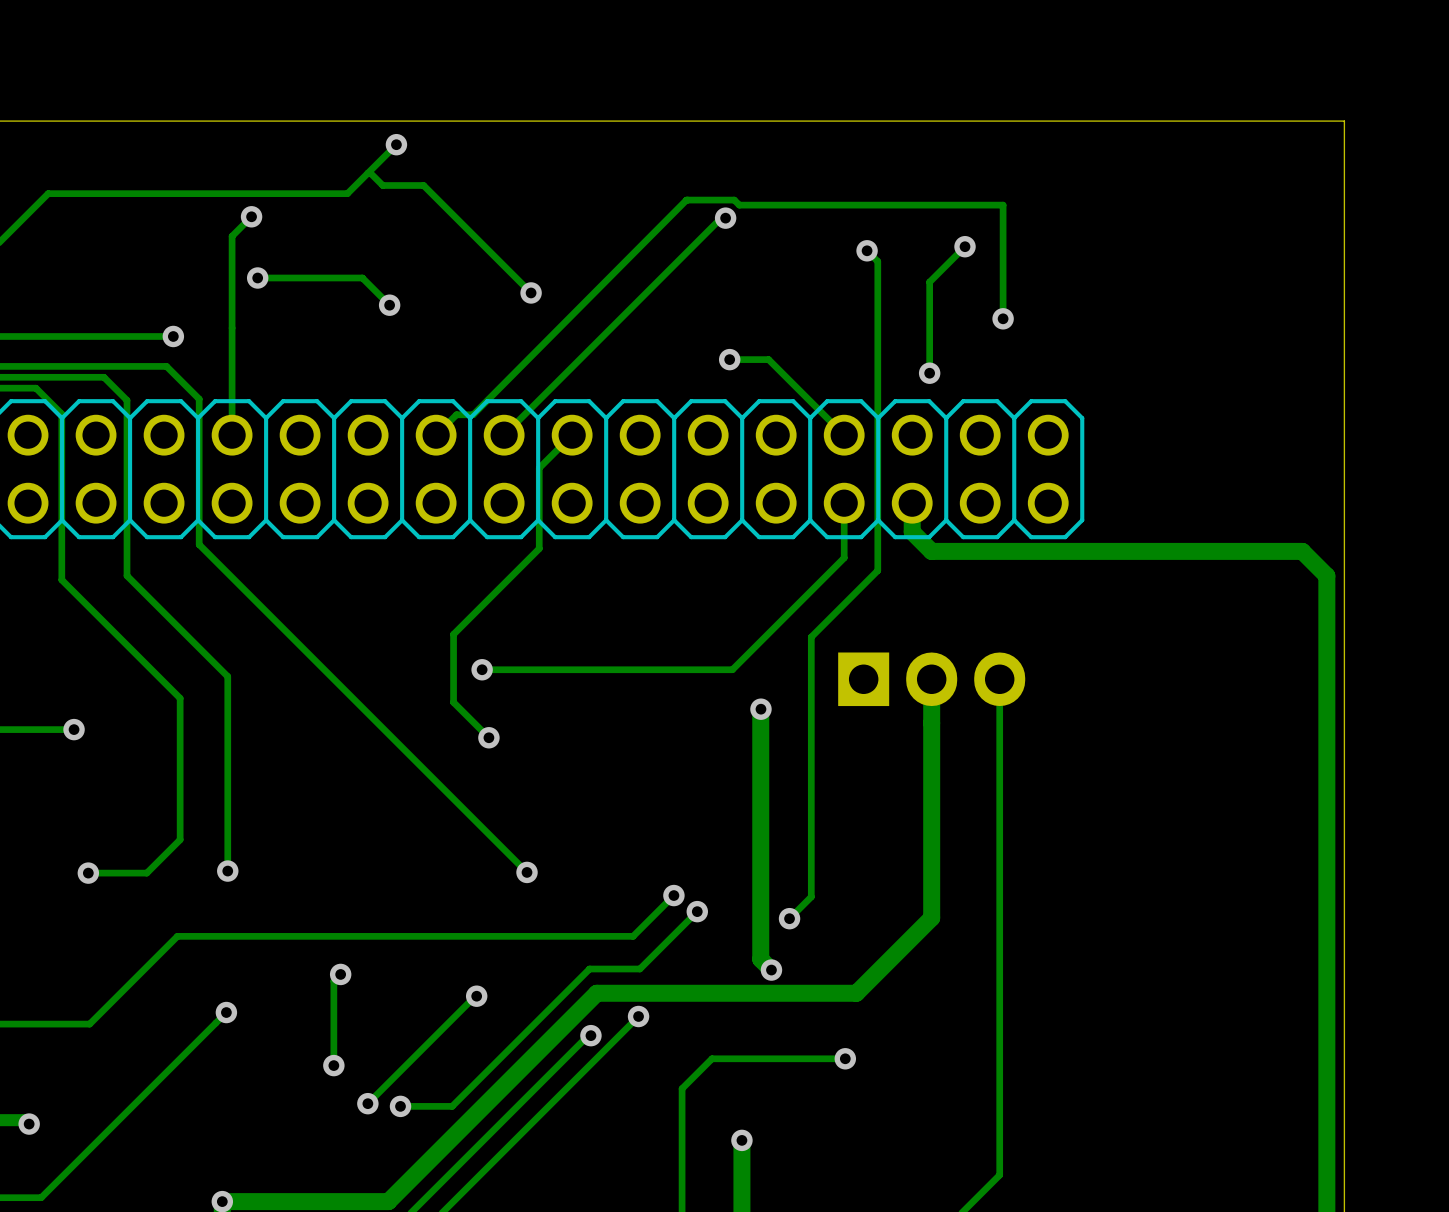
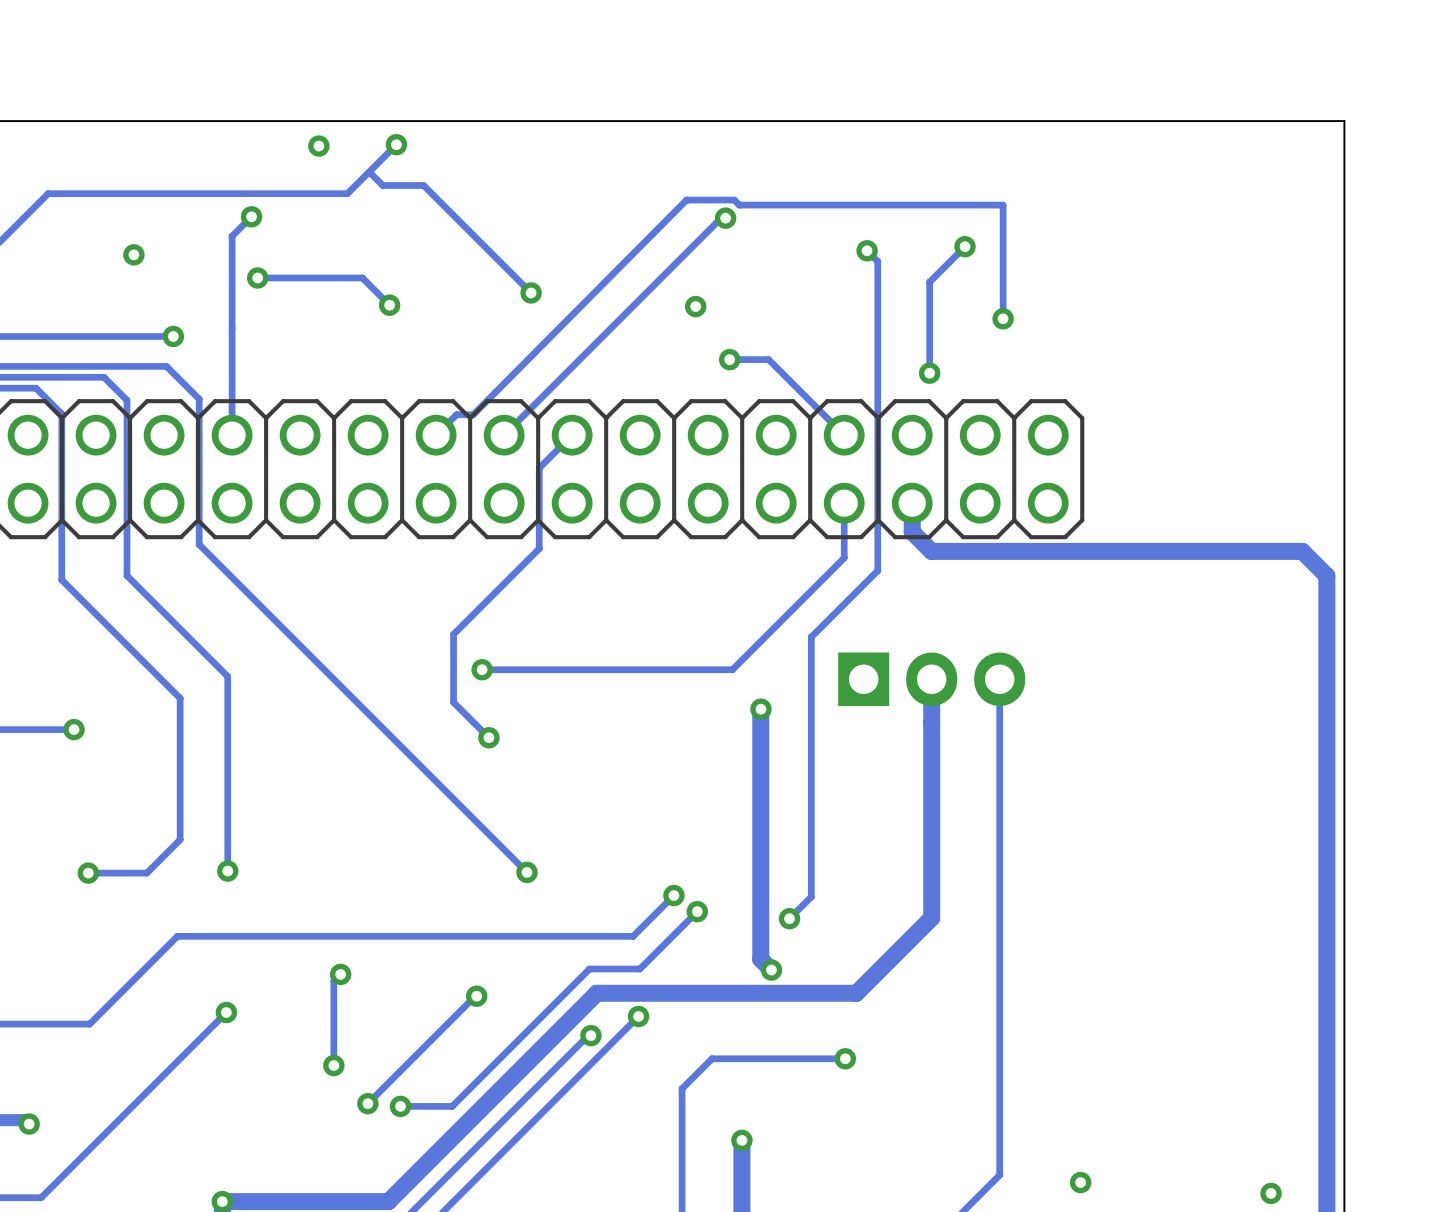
via: none -> (318, 146)
via: none -> (133, 254)
via: none -> (695, 306)
via: none -> (1080, 1182)
via: none -> (1271, 1193)

